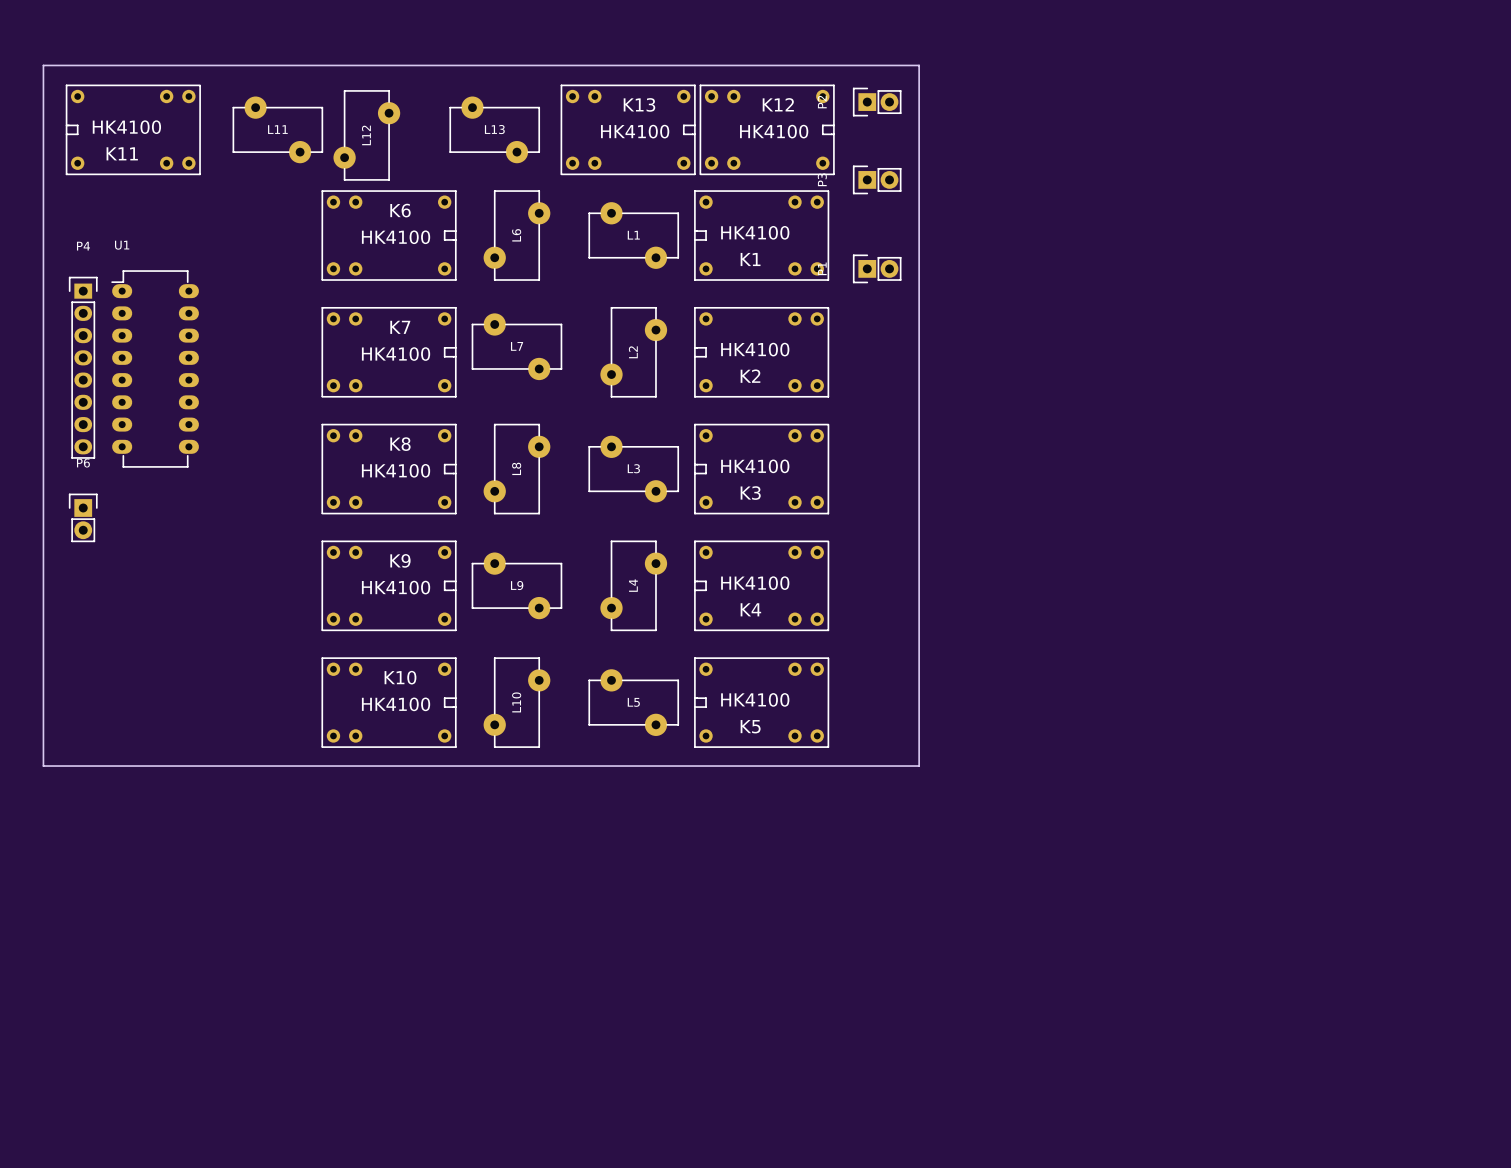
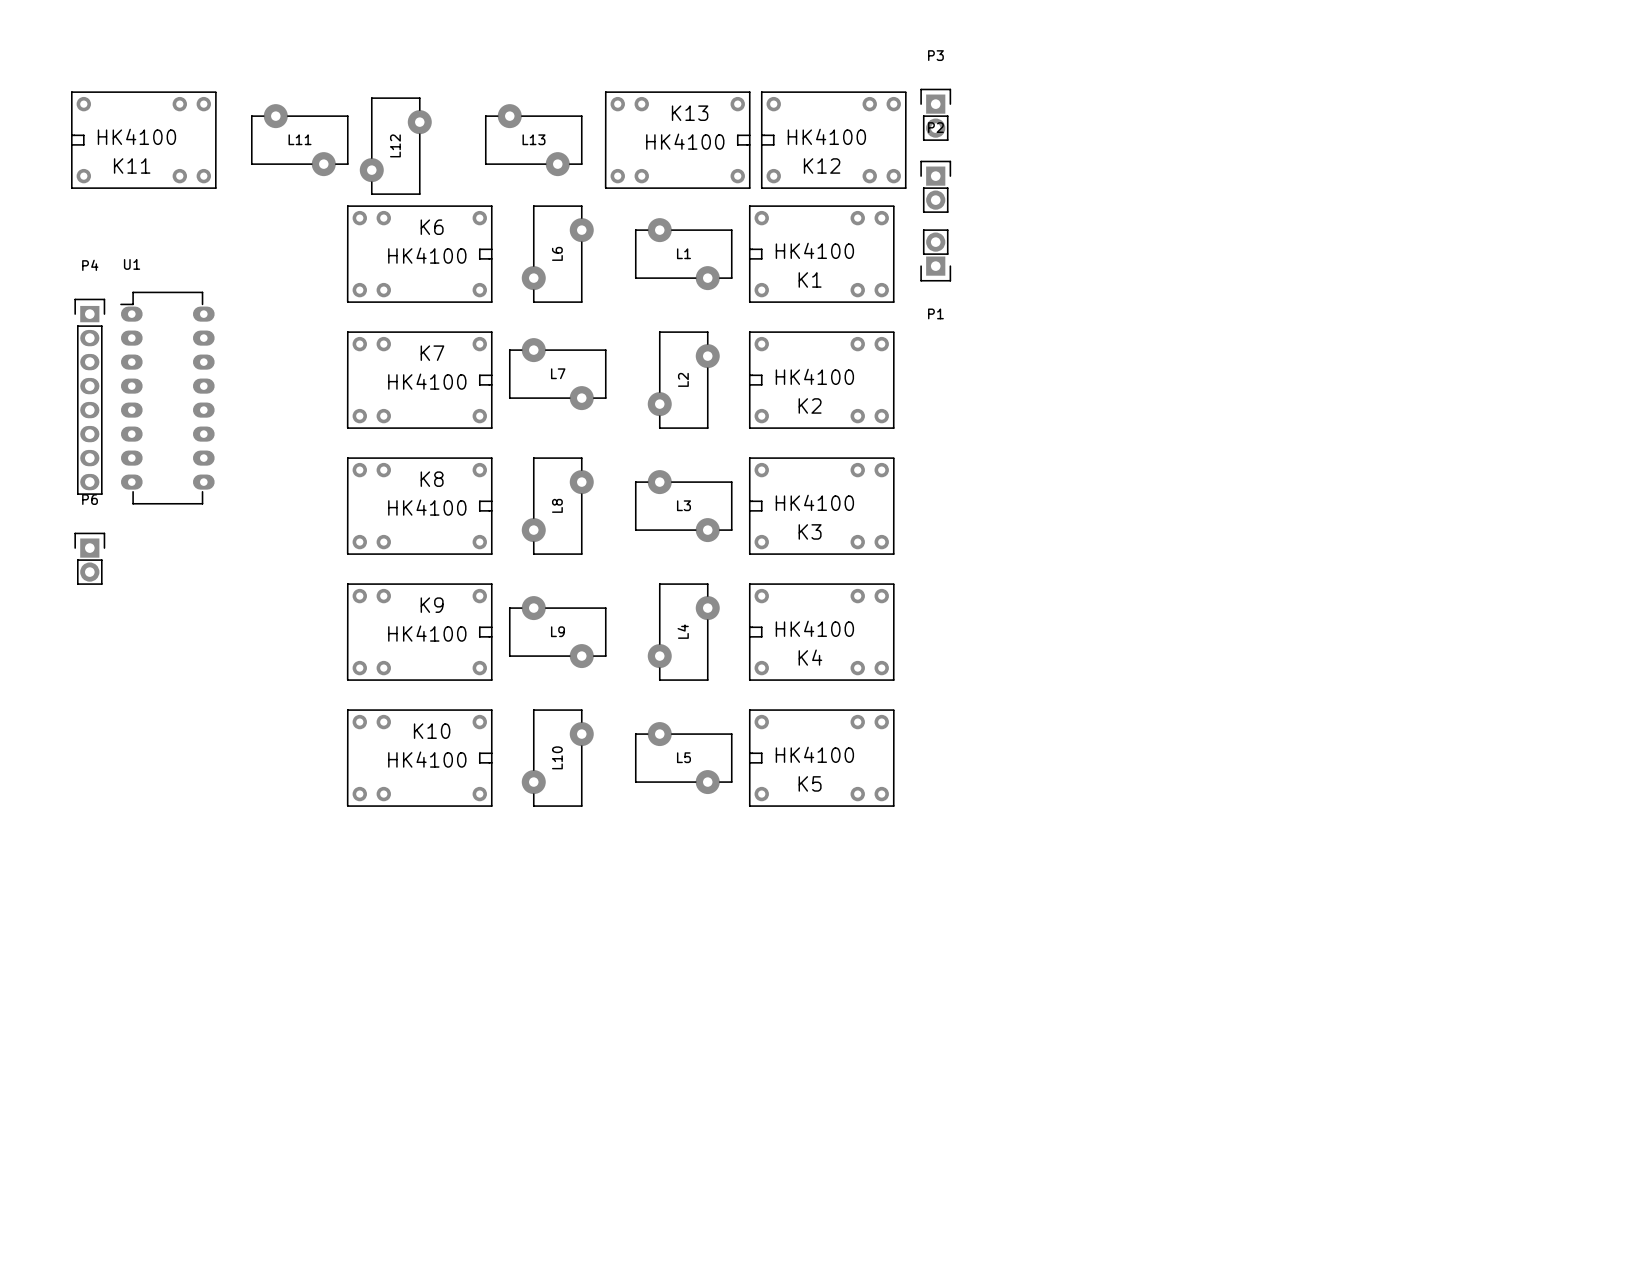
board edge: (43, 65) (43, 766) (919, 766) (919, 65) (43, 65) -> none
P2 rotation: 0° (877, 102) -> 90° clockwise (935, 186)
P2 position: (877, 102) -> (935, 186)
K12 rotation: 0° (767, 129) -> 180° (833, 140)
P3 rotation: 0° (877, 179) -> 90° clockwise (935, 114)
P3 position: (877, 179) -> (935, 114)
P1 rotation: 0° (877, 268) -> 90° counterclockwise (935, 255)
P1 position: (877, 268) -> (935, 255)

